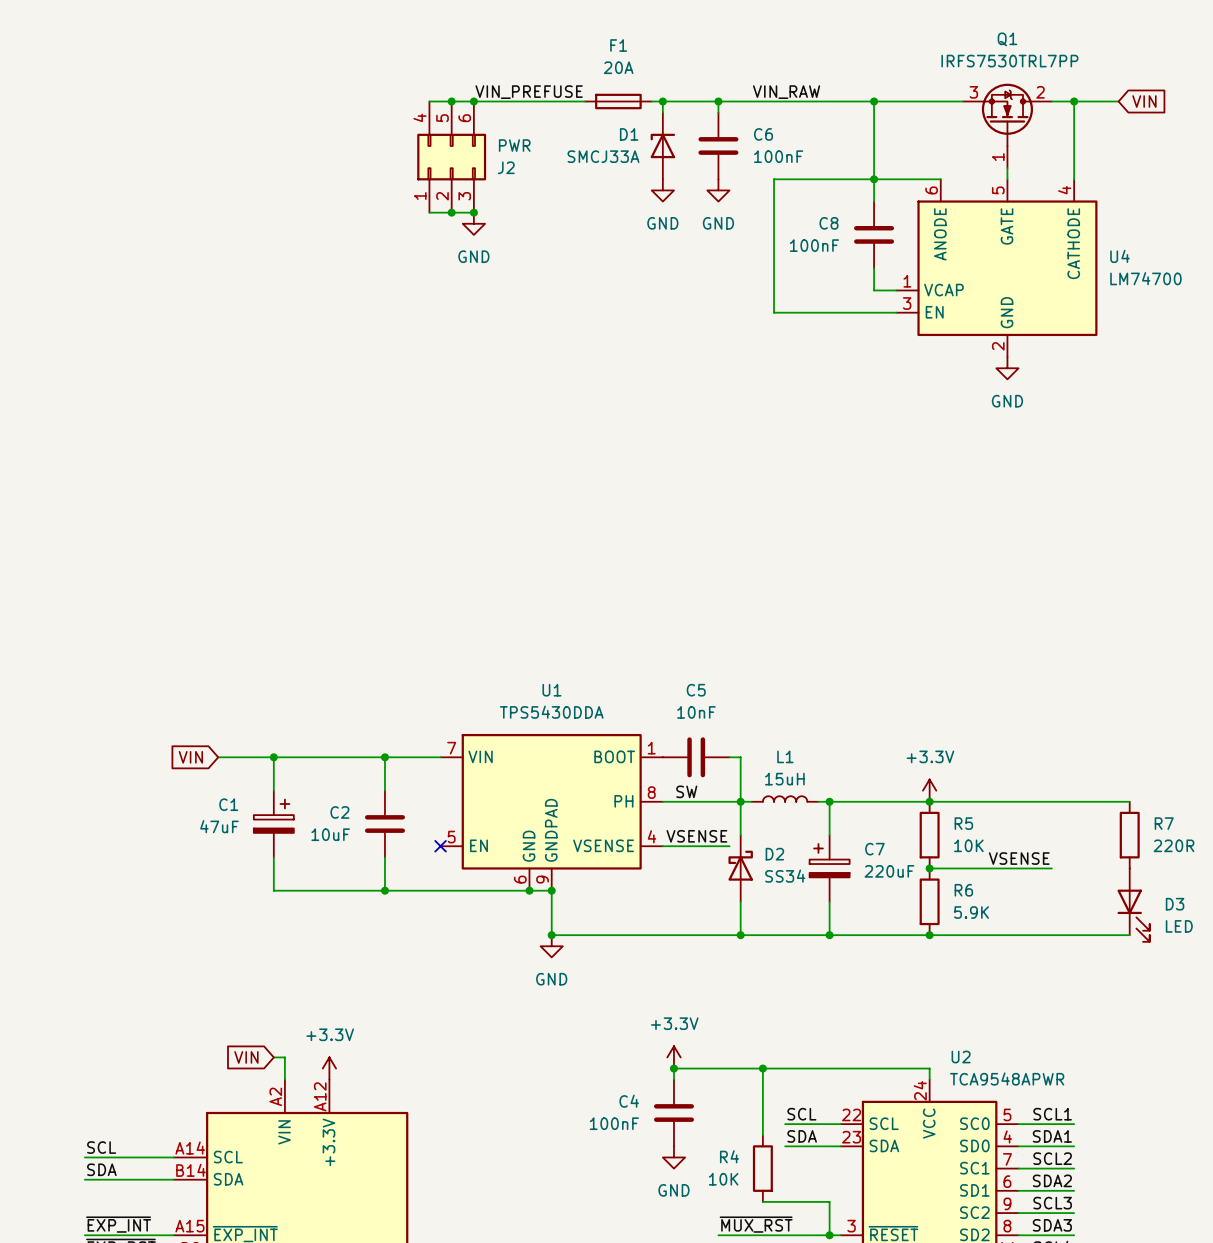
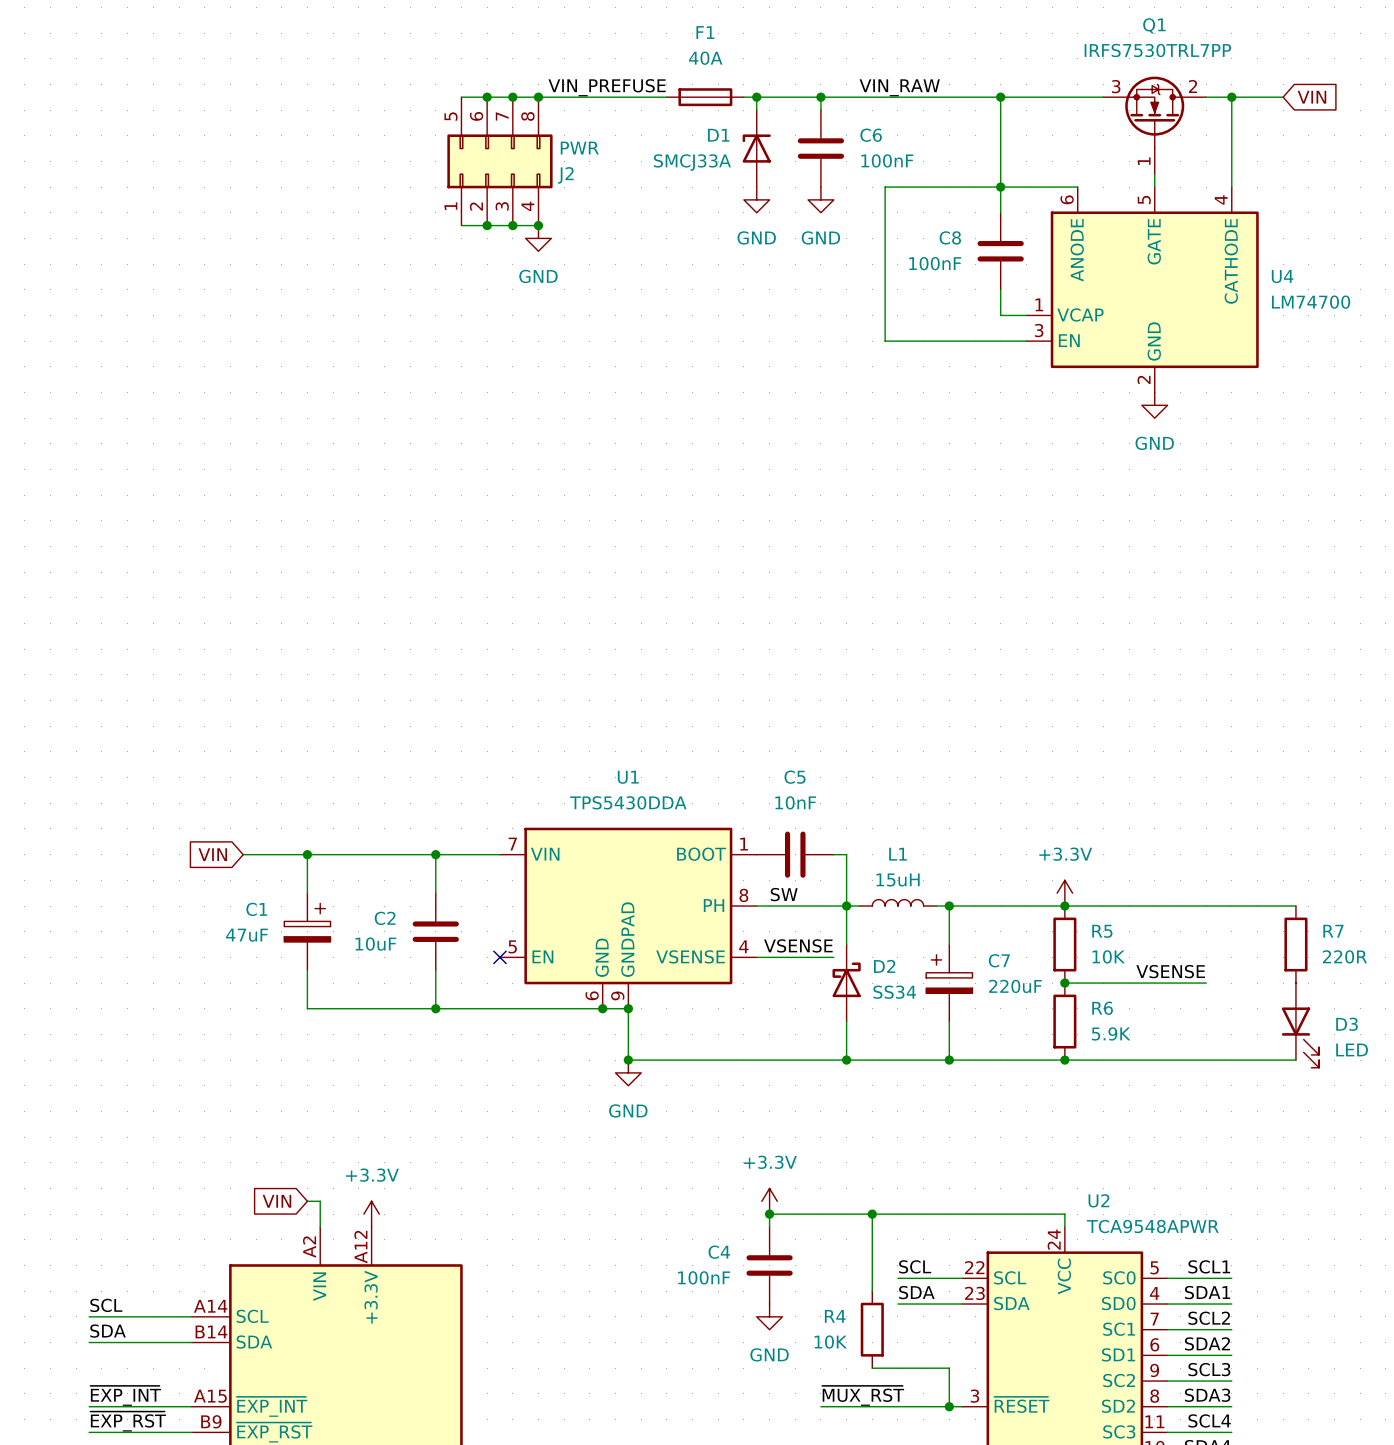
F1 value: 20A (618, 67) -> 40A (705, 58)
wire: none -> (461, 97) (487, 97)
J2 symbol: [417, 101, 487, 213] -> [447, 97, 553, 226]
junction: none -> (487, 97)
wire: none -> (461, 225) (487, 225)
junction: none -> (487, 225)

